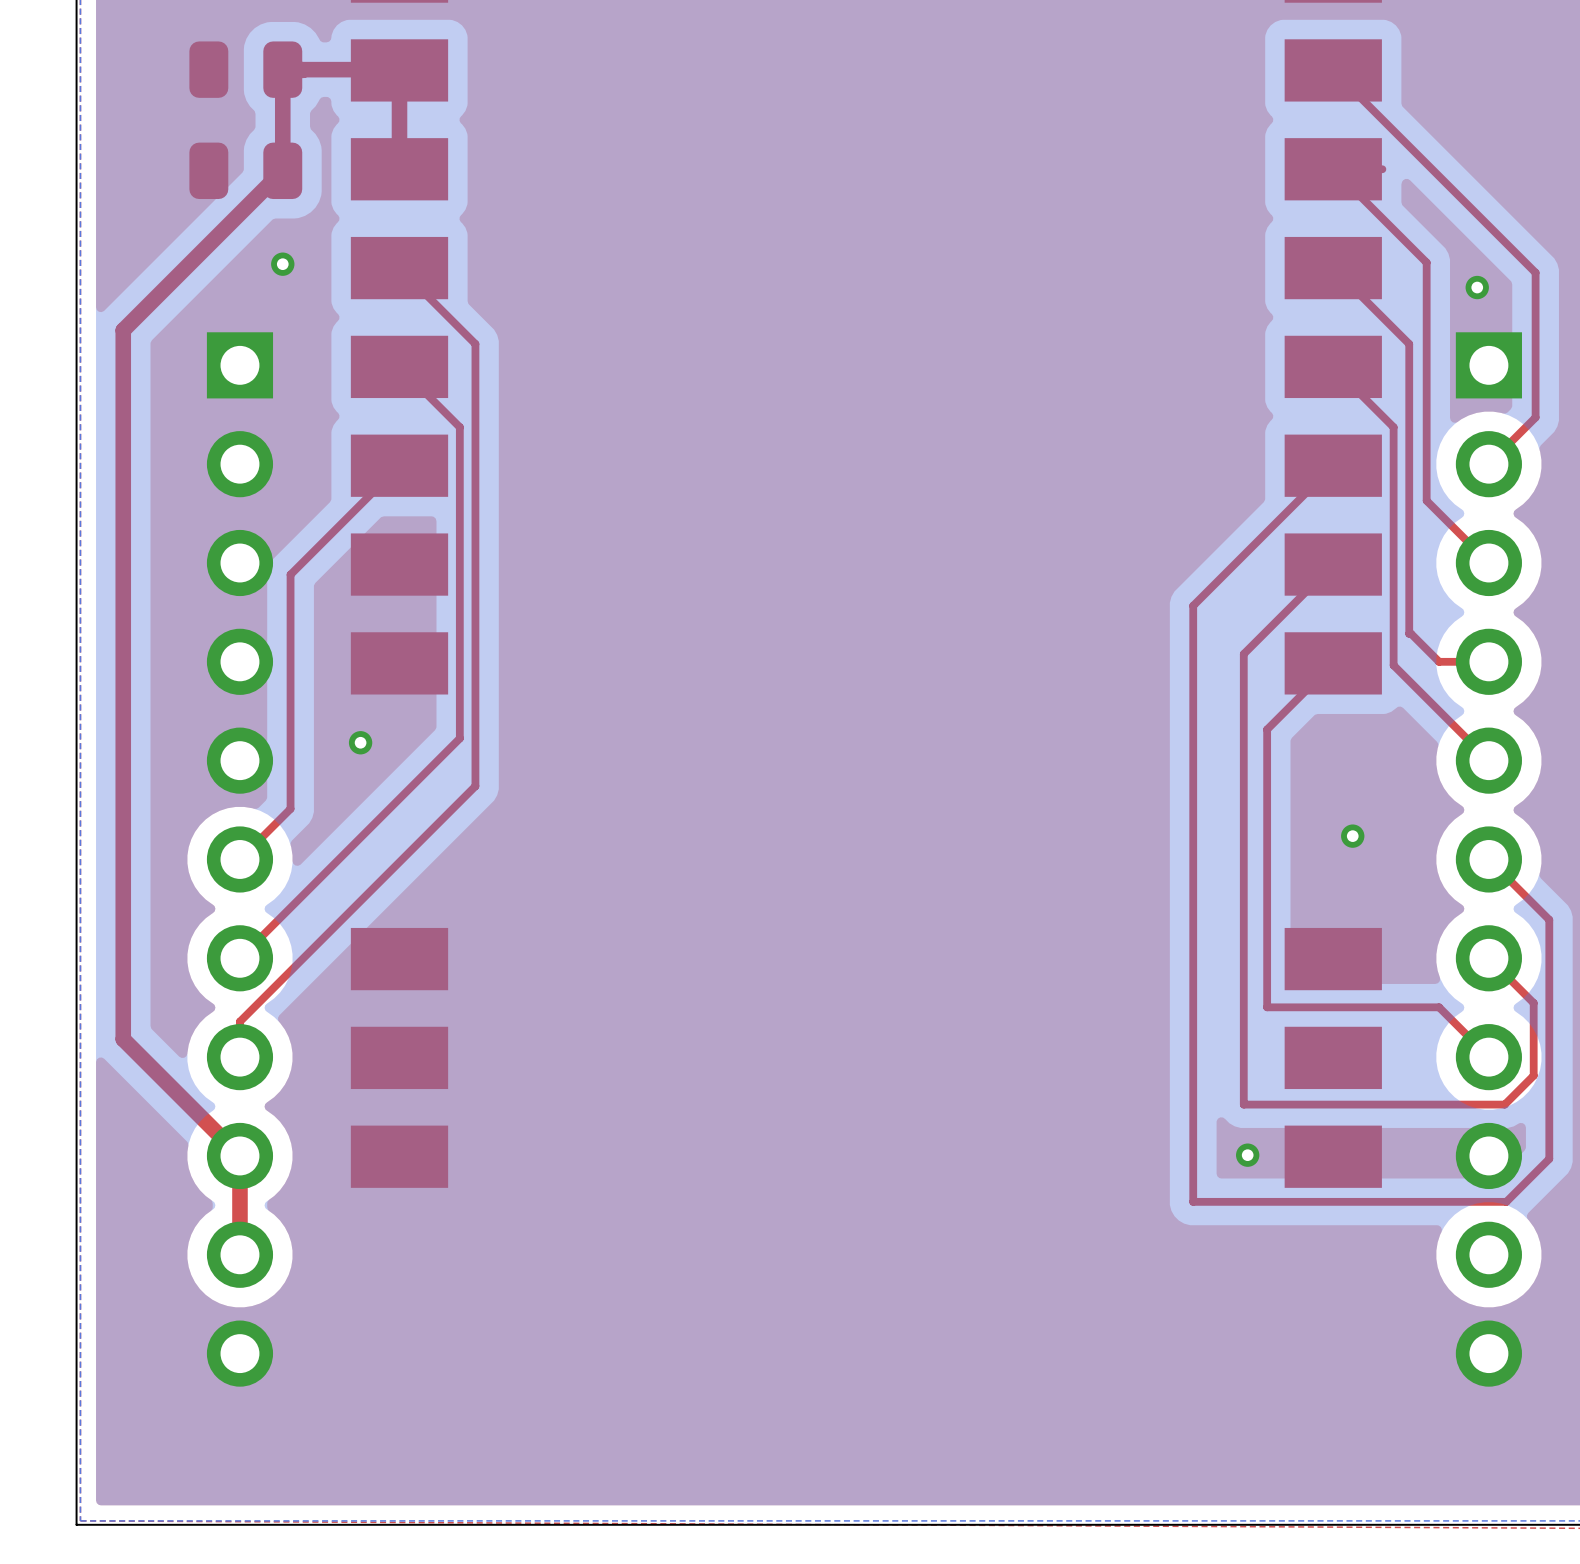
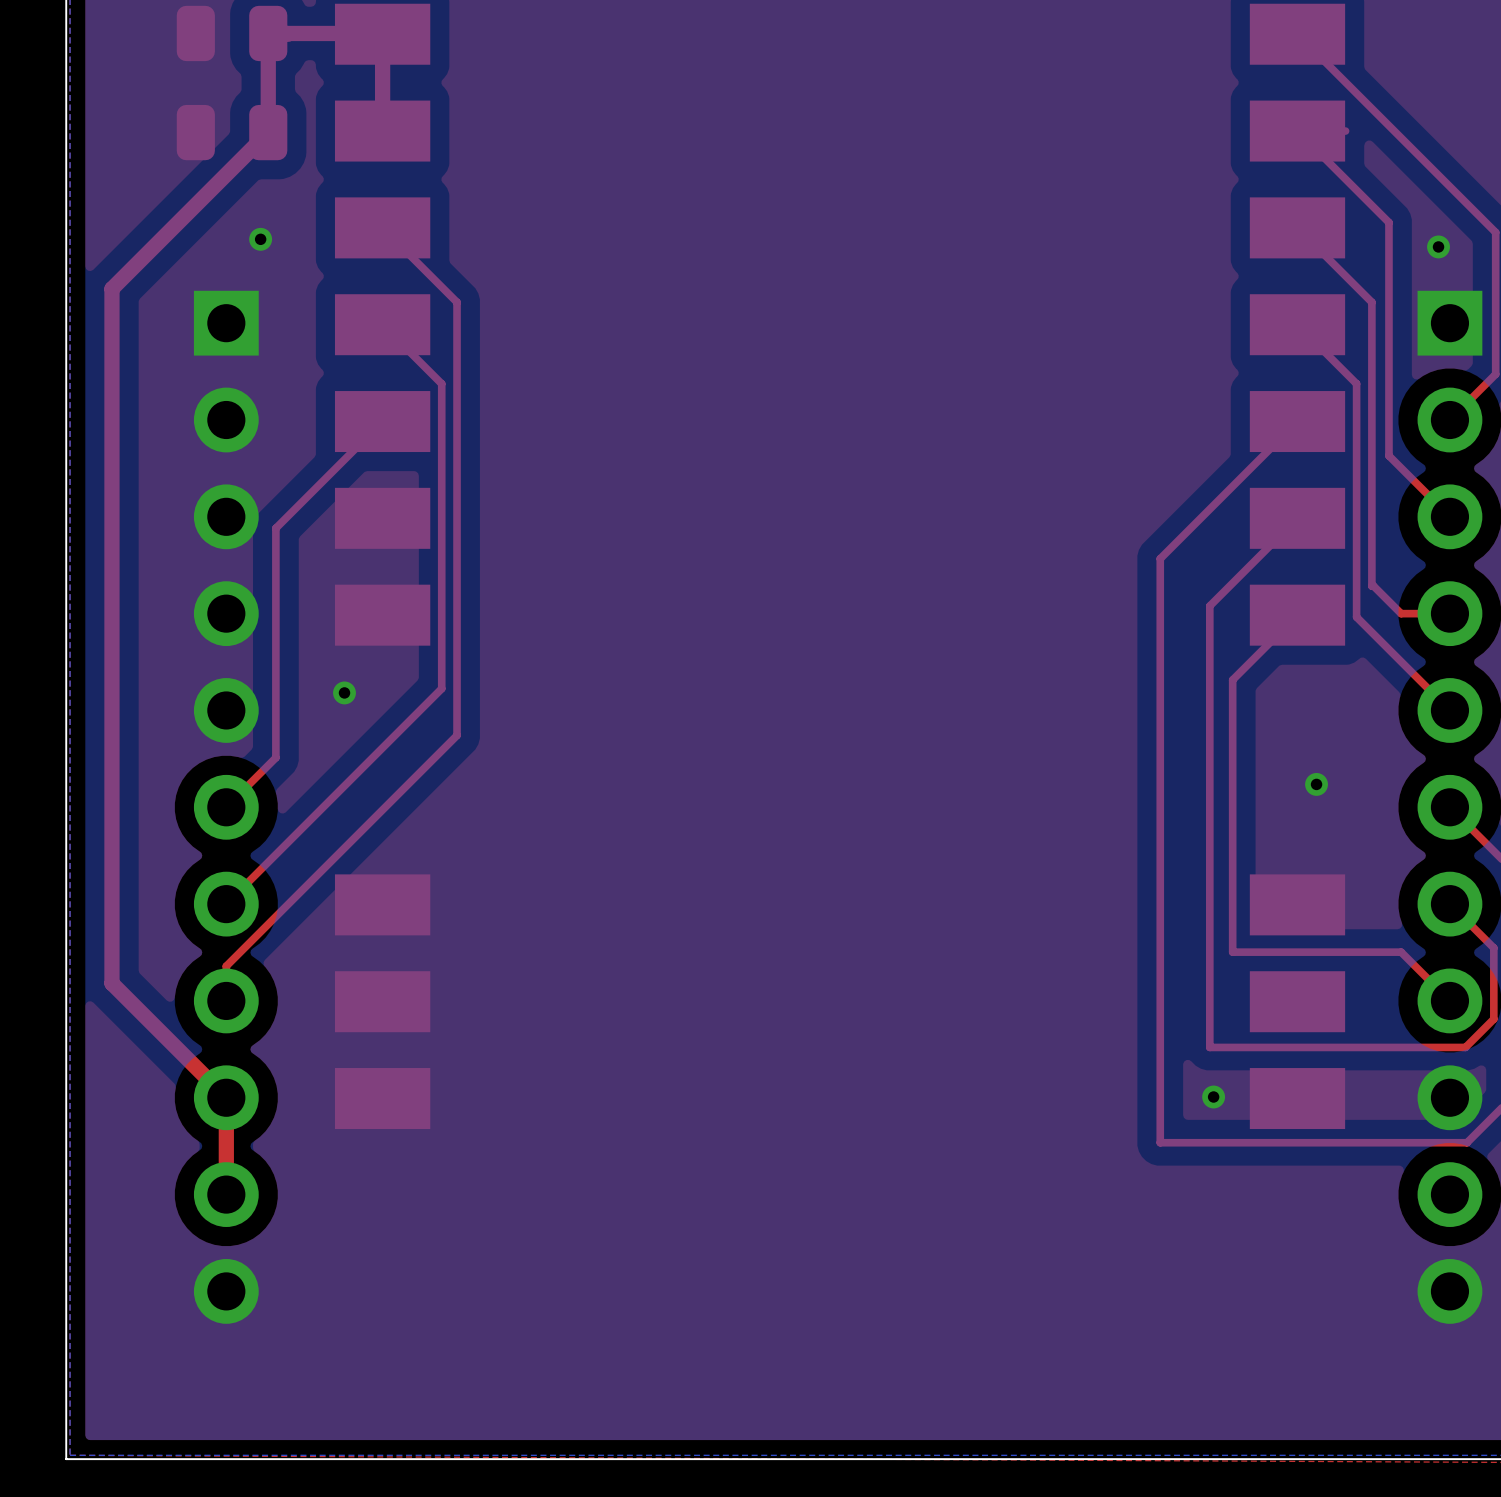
via position: (282, 264) -> (260, 239)

